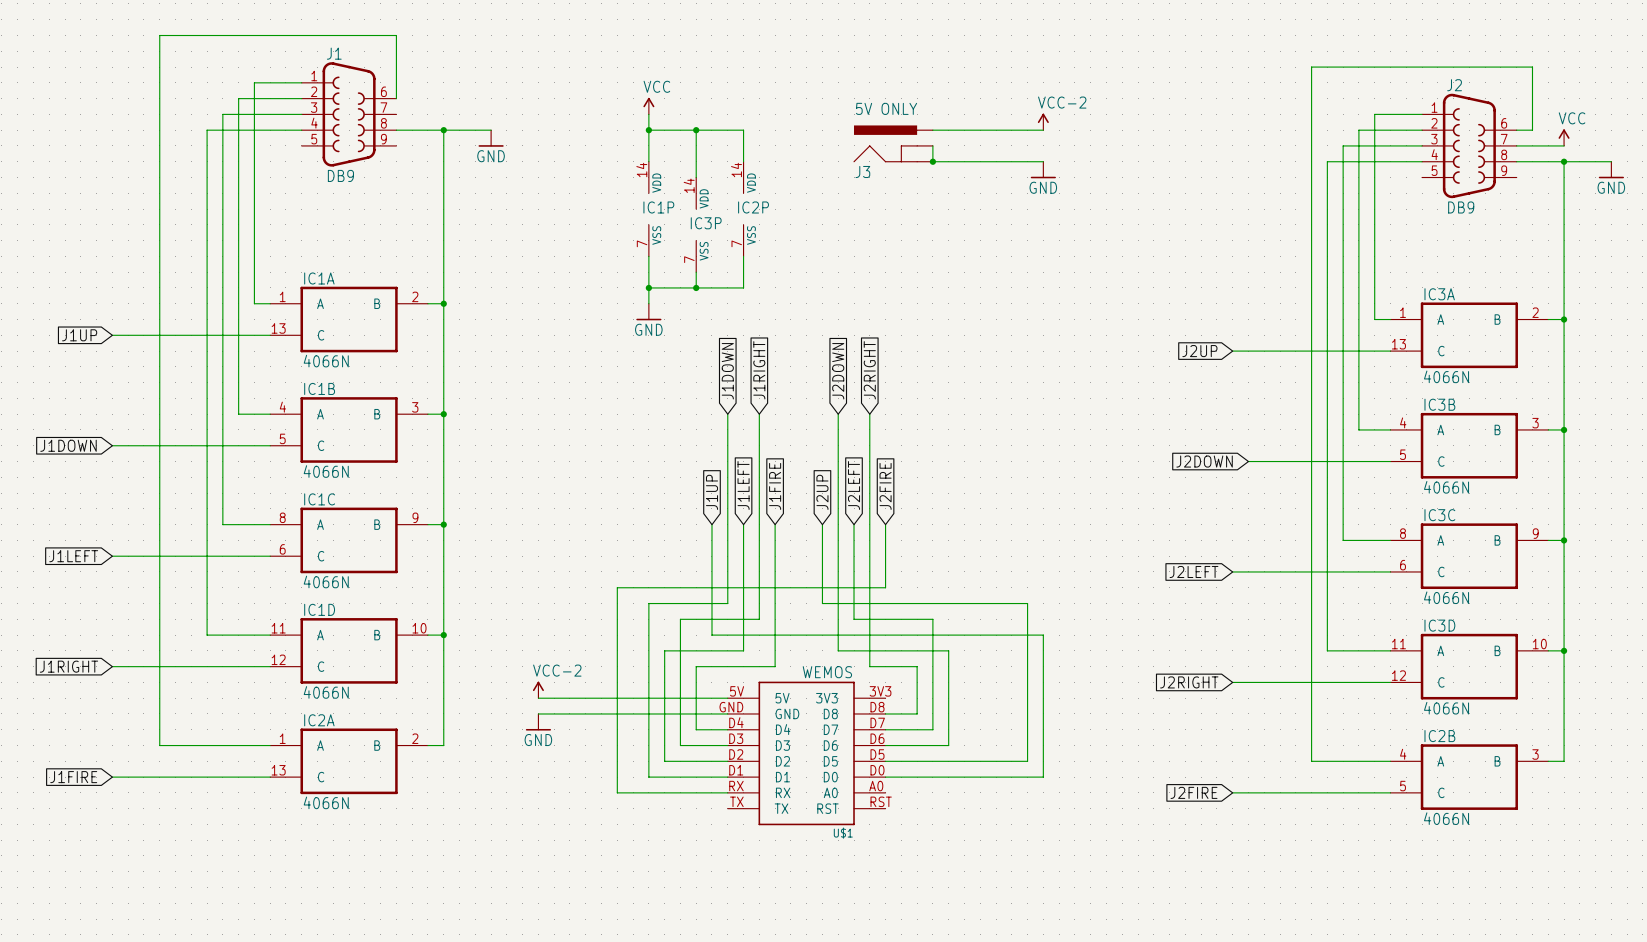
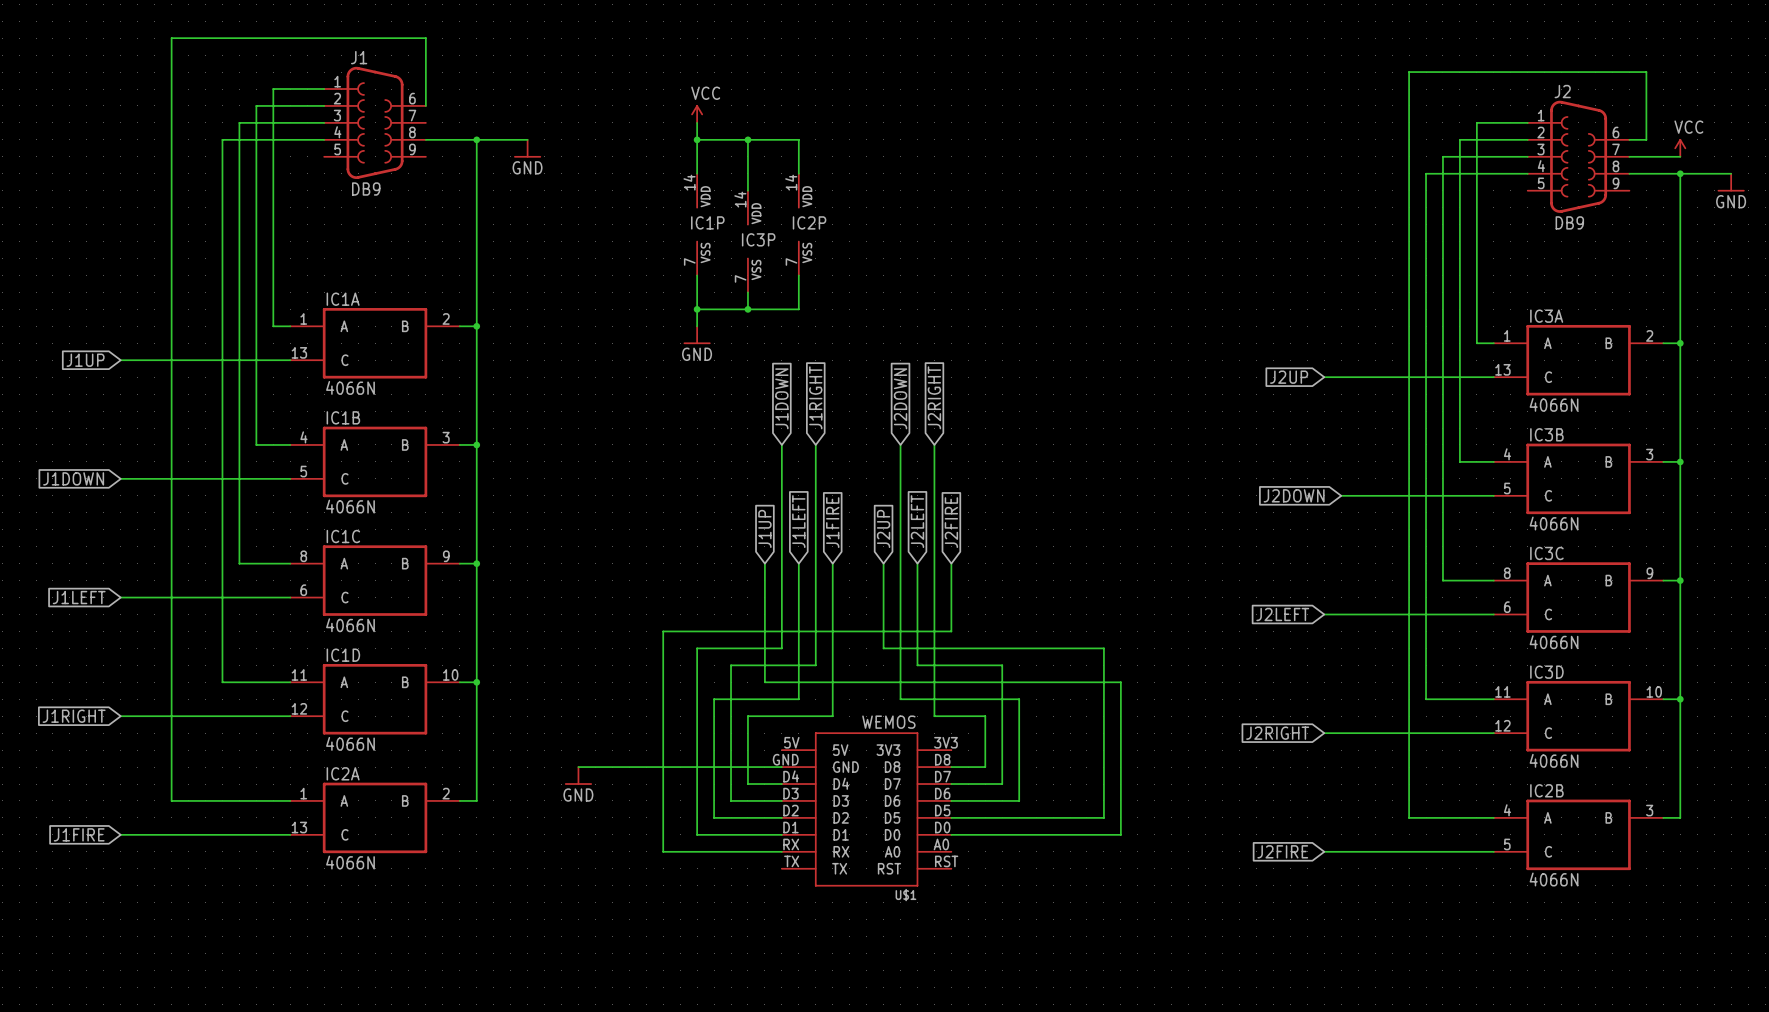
power symbol: VCC-2 (1043, 121) -> none
wire: (932, 130) (1043, 130) -> none
J3: 5V ONLY (893, 143) -> none
wire: (932, 145) (932, 161) (1043, 161) -> none
junction: (932, 161) -> none
power symbol: GND (1043, 170) -> none
power symbol: VCC-2 (538, 689) -> none
wire: (538, 698) (727, 698) -> none

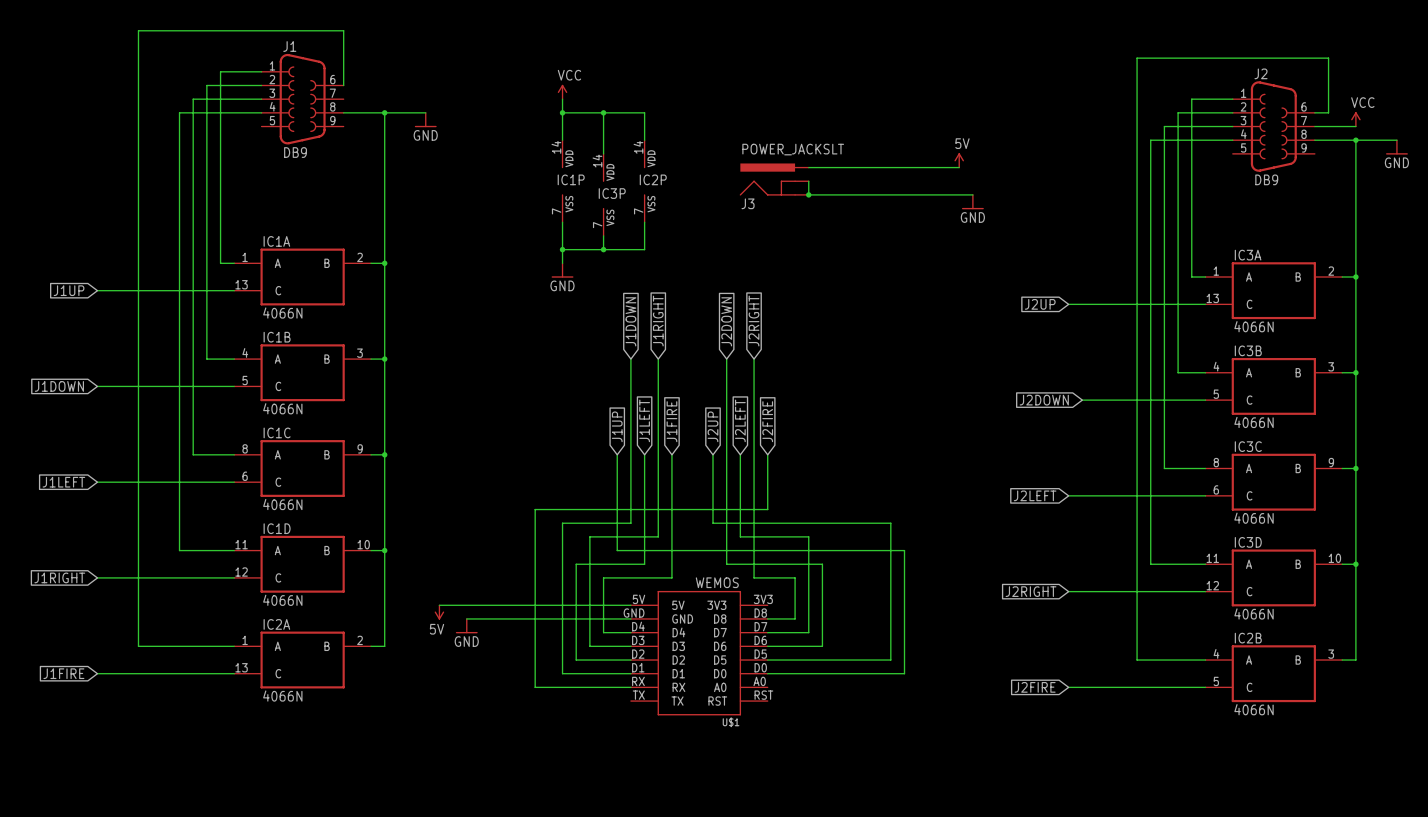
power symbol: none -> 5V (959, 160)
wire: none -> (808, 167) (959, 167)
J3: none -> POWER_JACKSLT (774, 179)
wire: none -> (808, 181) (808, 194) (972, 194)
junction: none -> (808, 194)
power symbol: none -> GND (972, 202)
wire: none -> (439, 605) (630, 605)
power symbol: none -> 5V (439, 612)

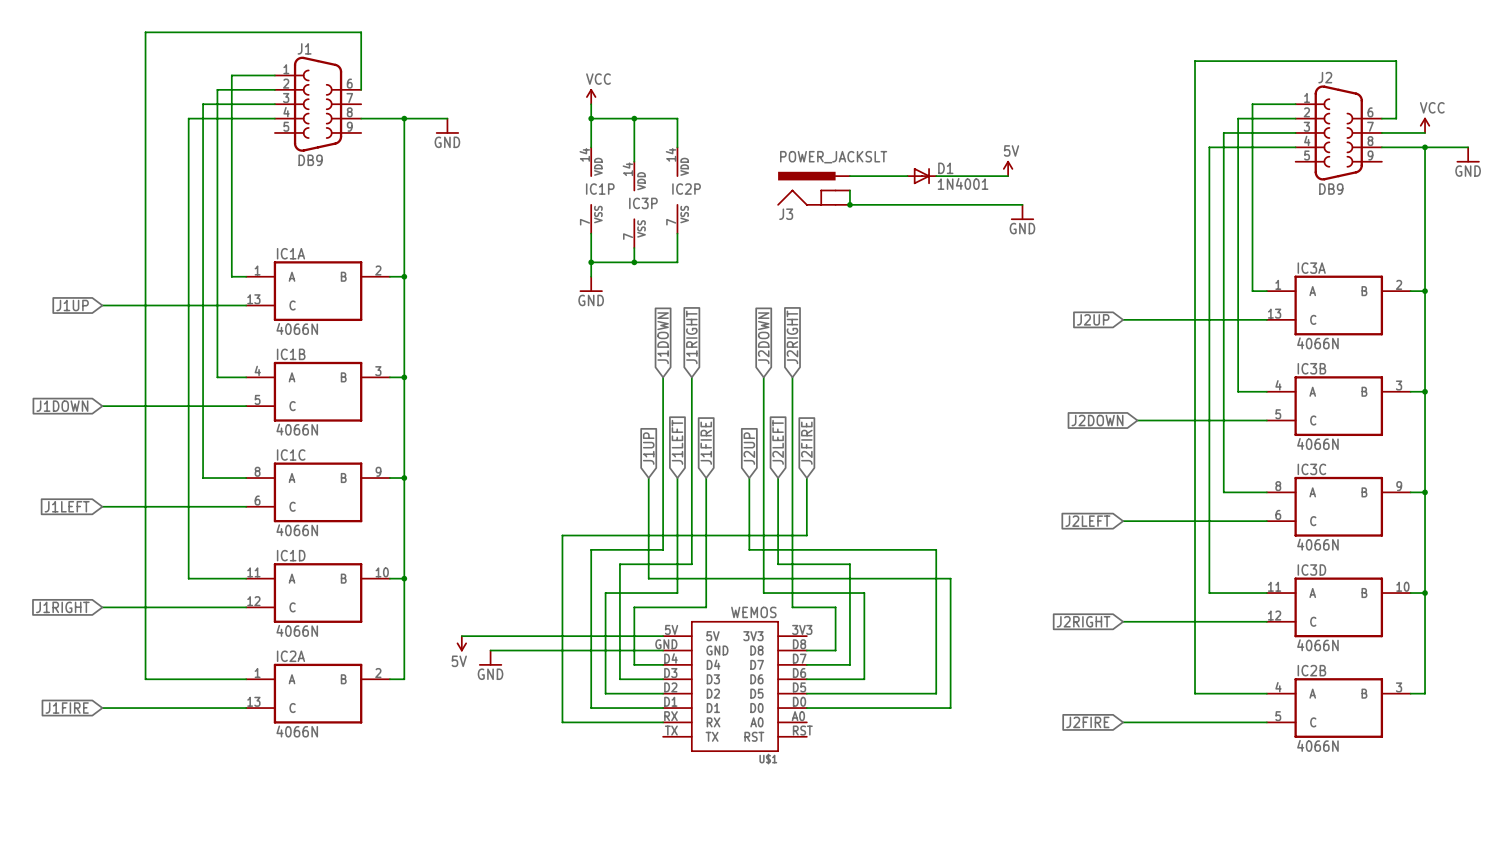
D1: none -> 1N4001 (921, 176)

